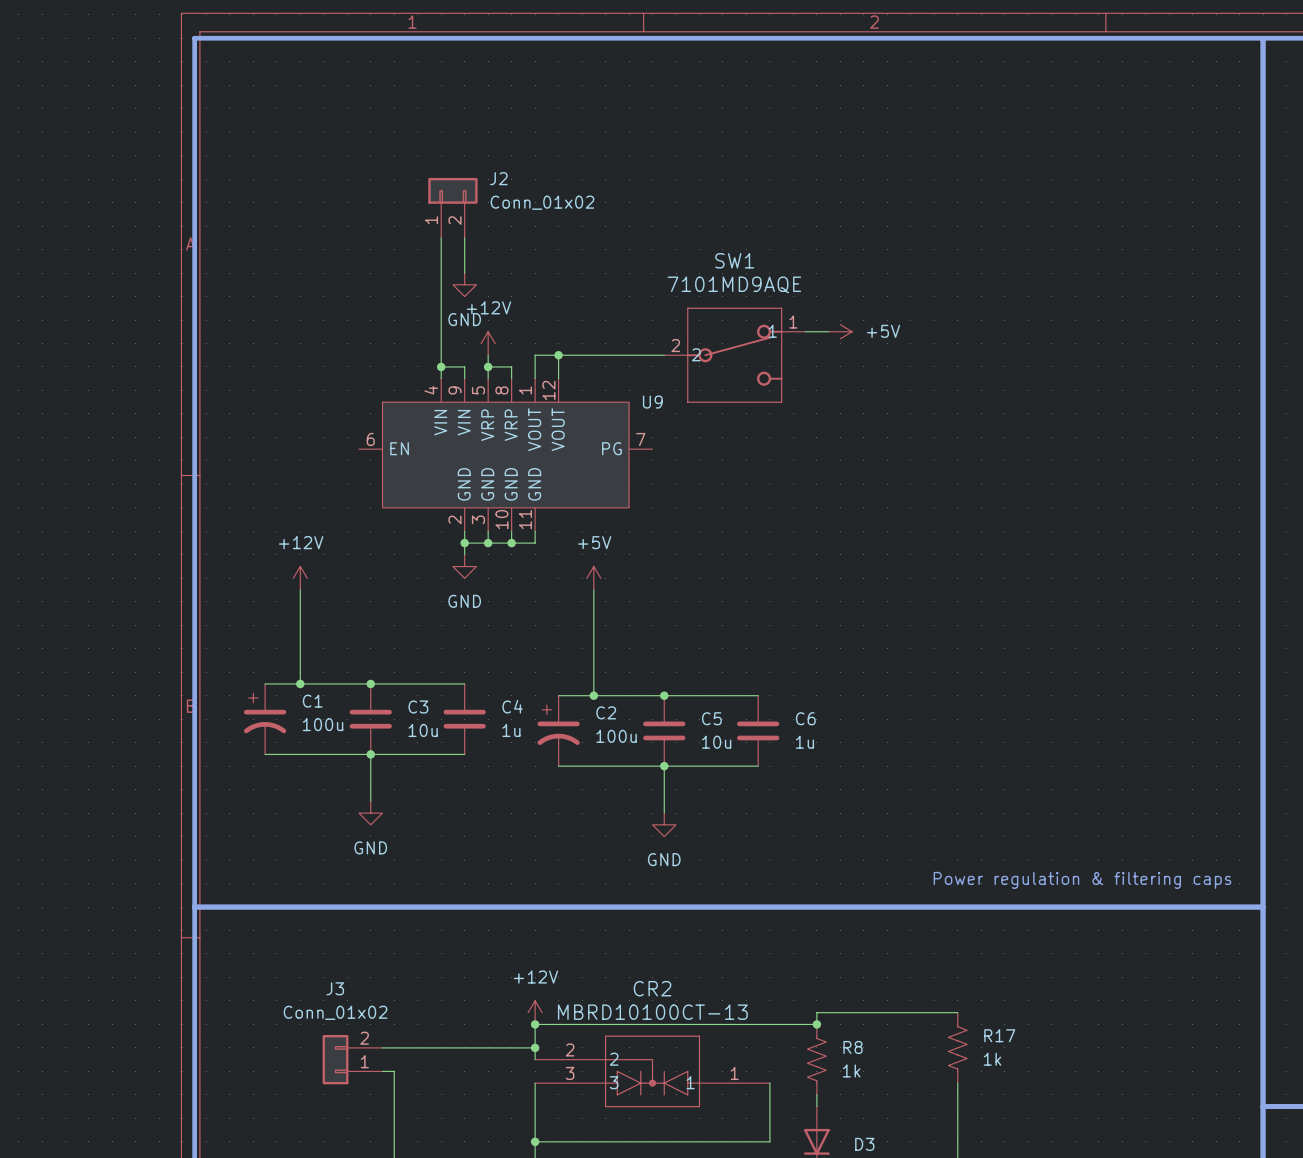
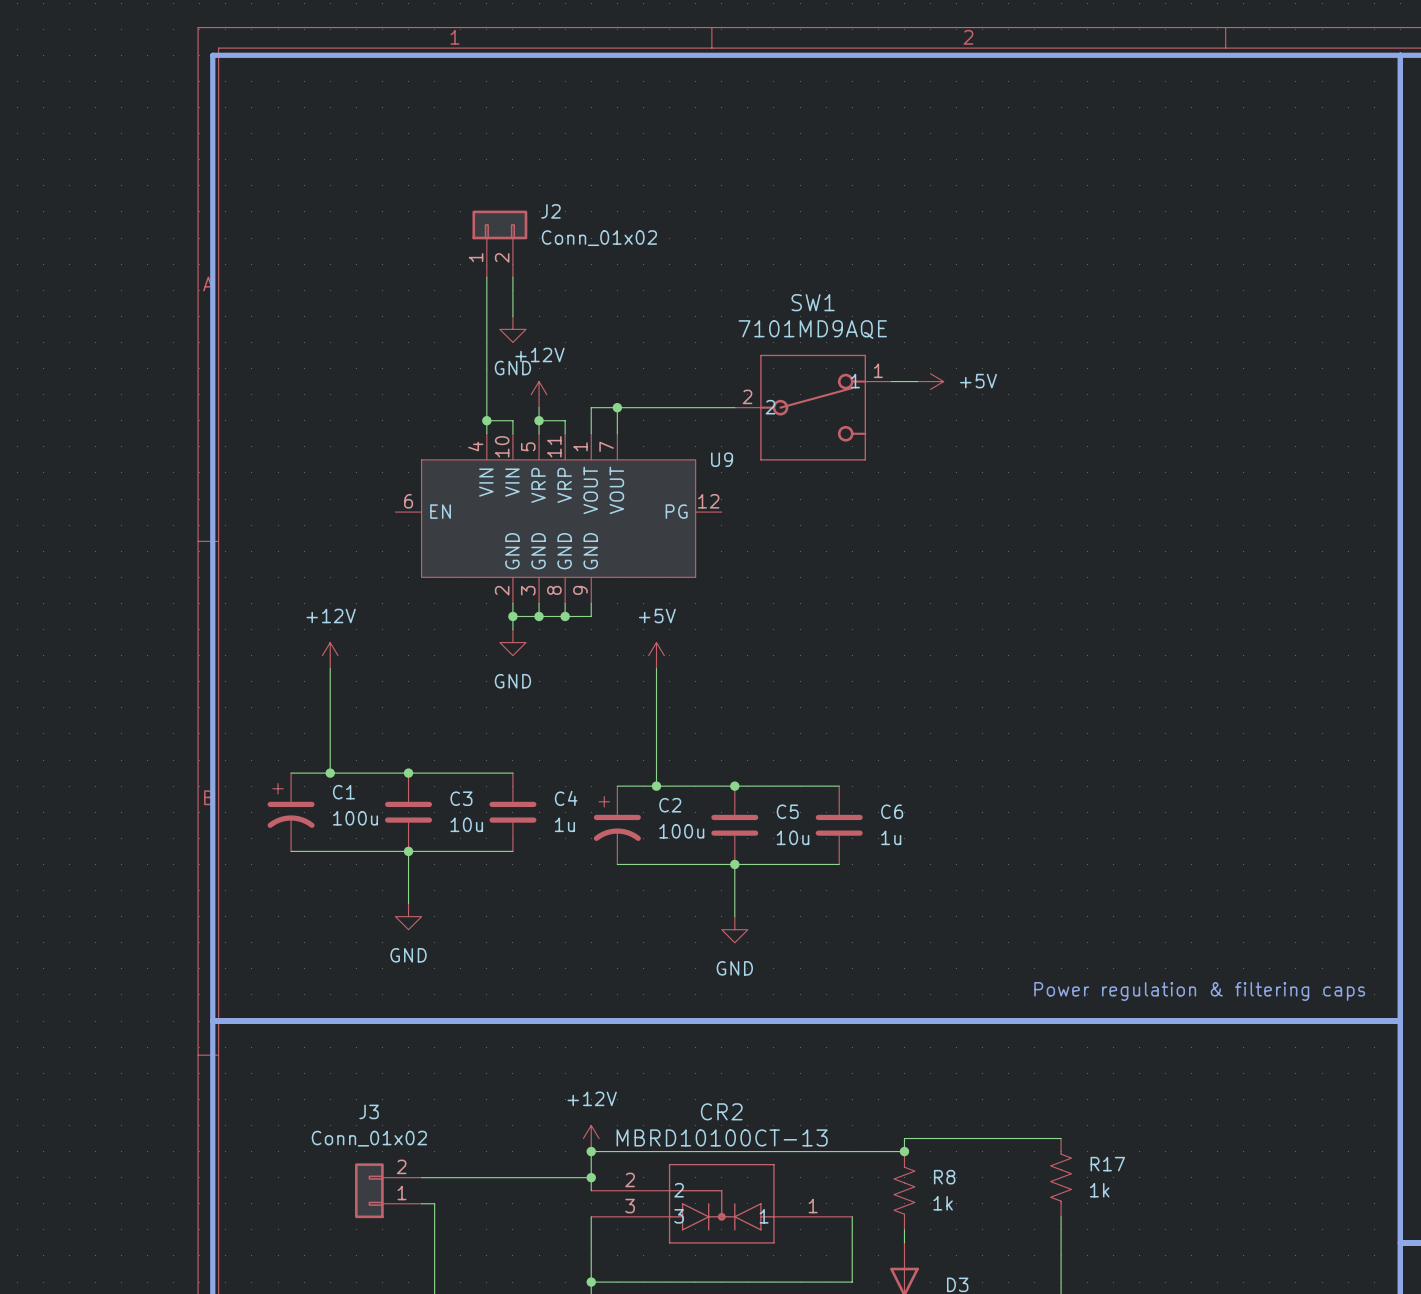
U9 pin number: 9 (454, 390) -> 10 (502, 446)
U9 pin number: 8 (501, 390) -> 11 (554, 446)
U9 pin number: 12 (548, 390) -> 7 (606, 446)
U9 pin number: 7 (640, 439) -> 12 (708, 501)
U9 pin number: 10 (501, 519) -> 8 (554, 590)
U9 pin number: 11 (525, 519) -> 9 (580, 590)

